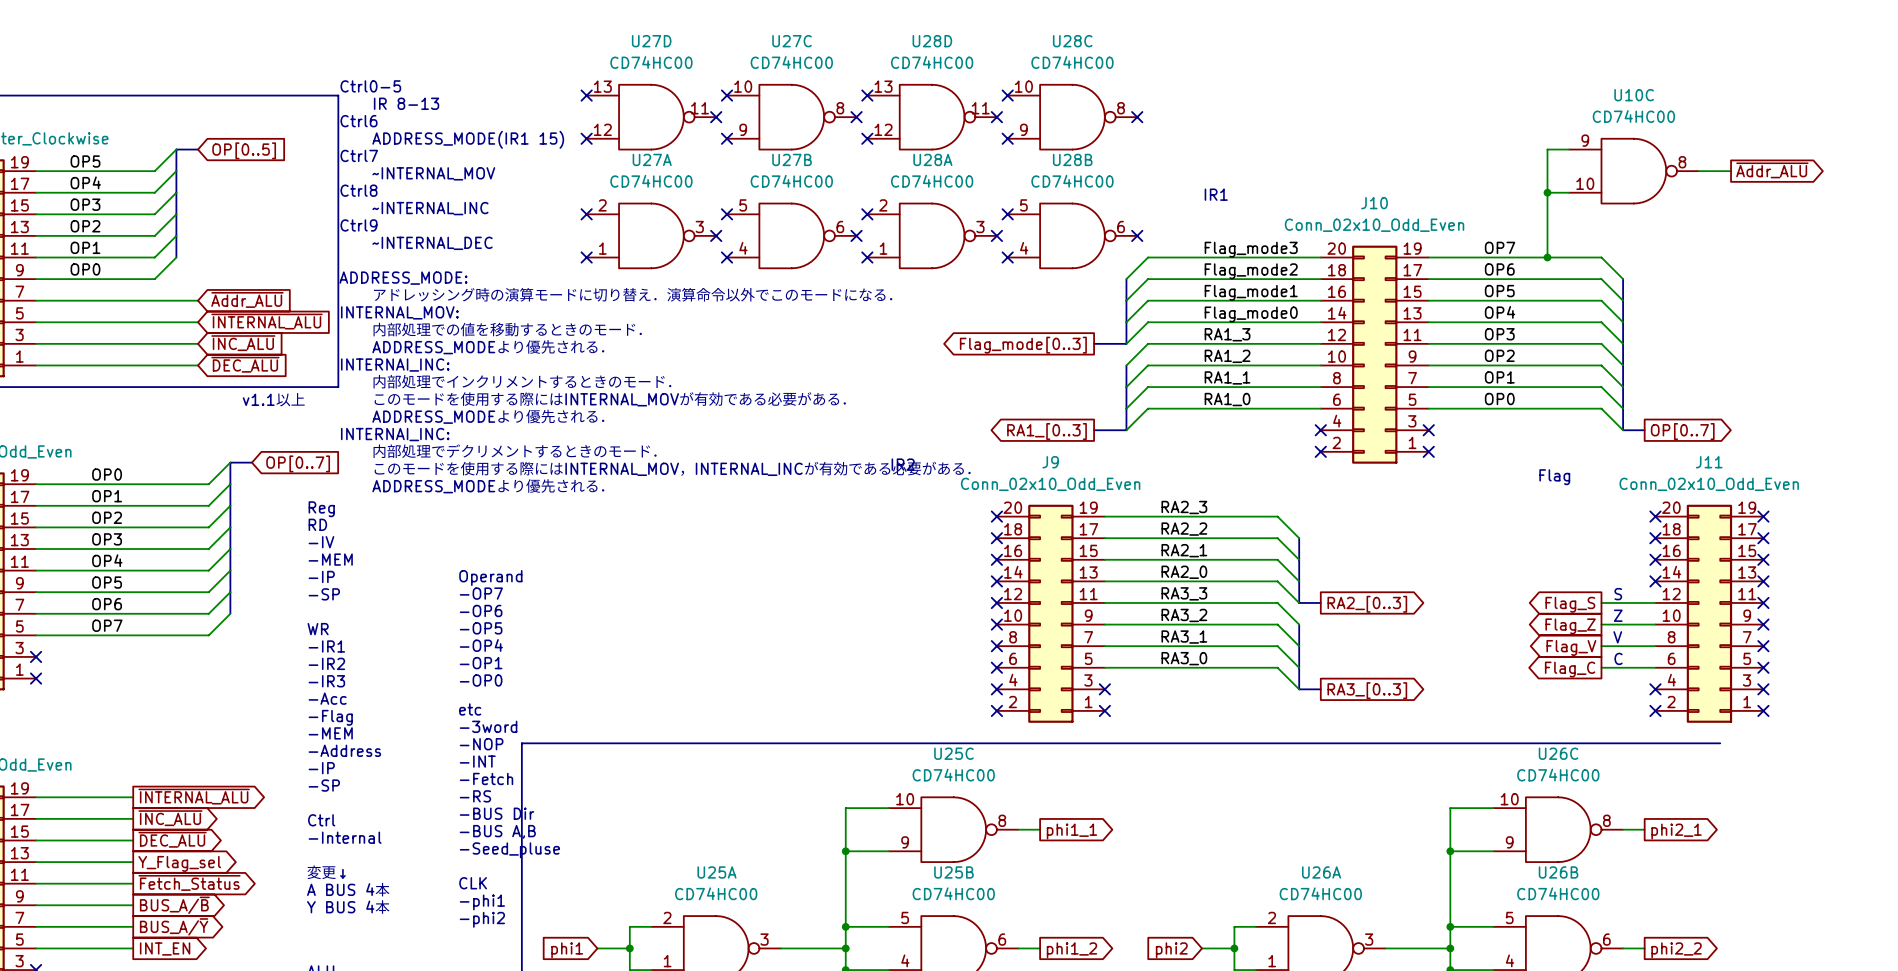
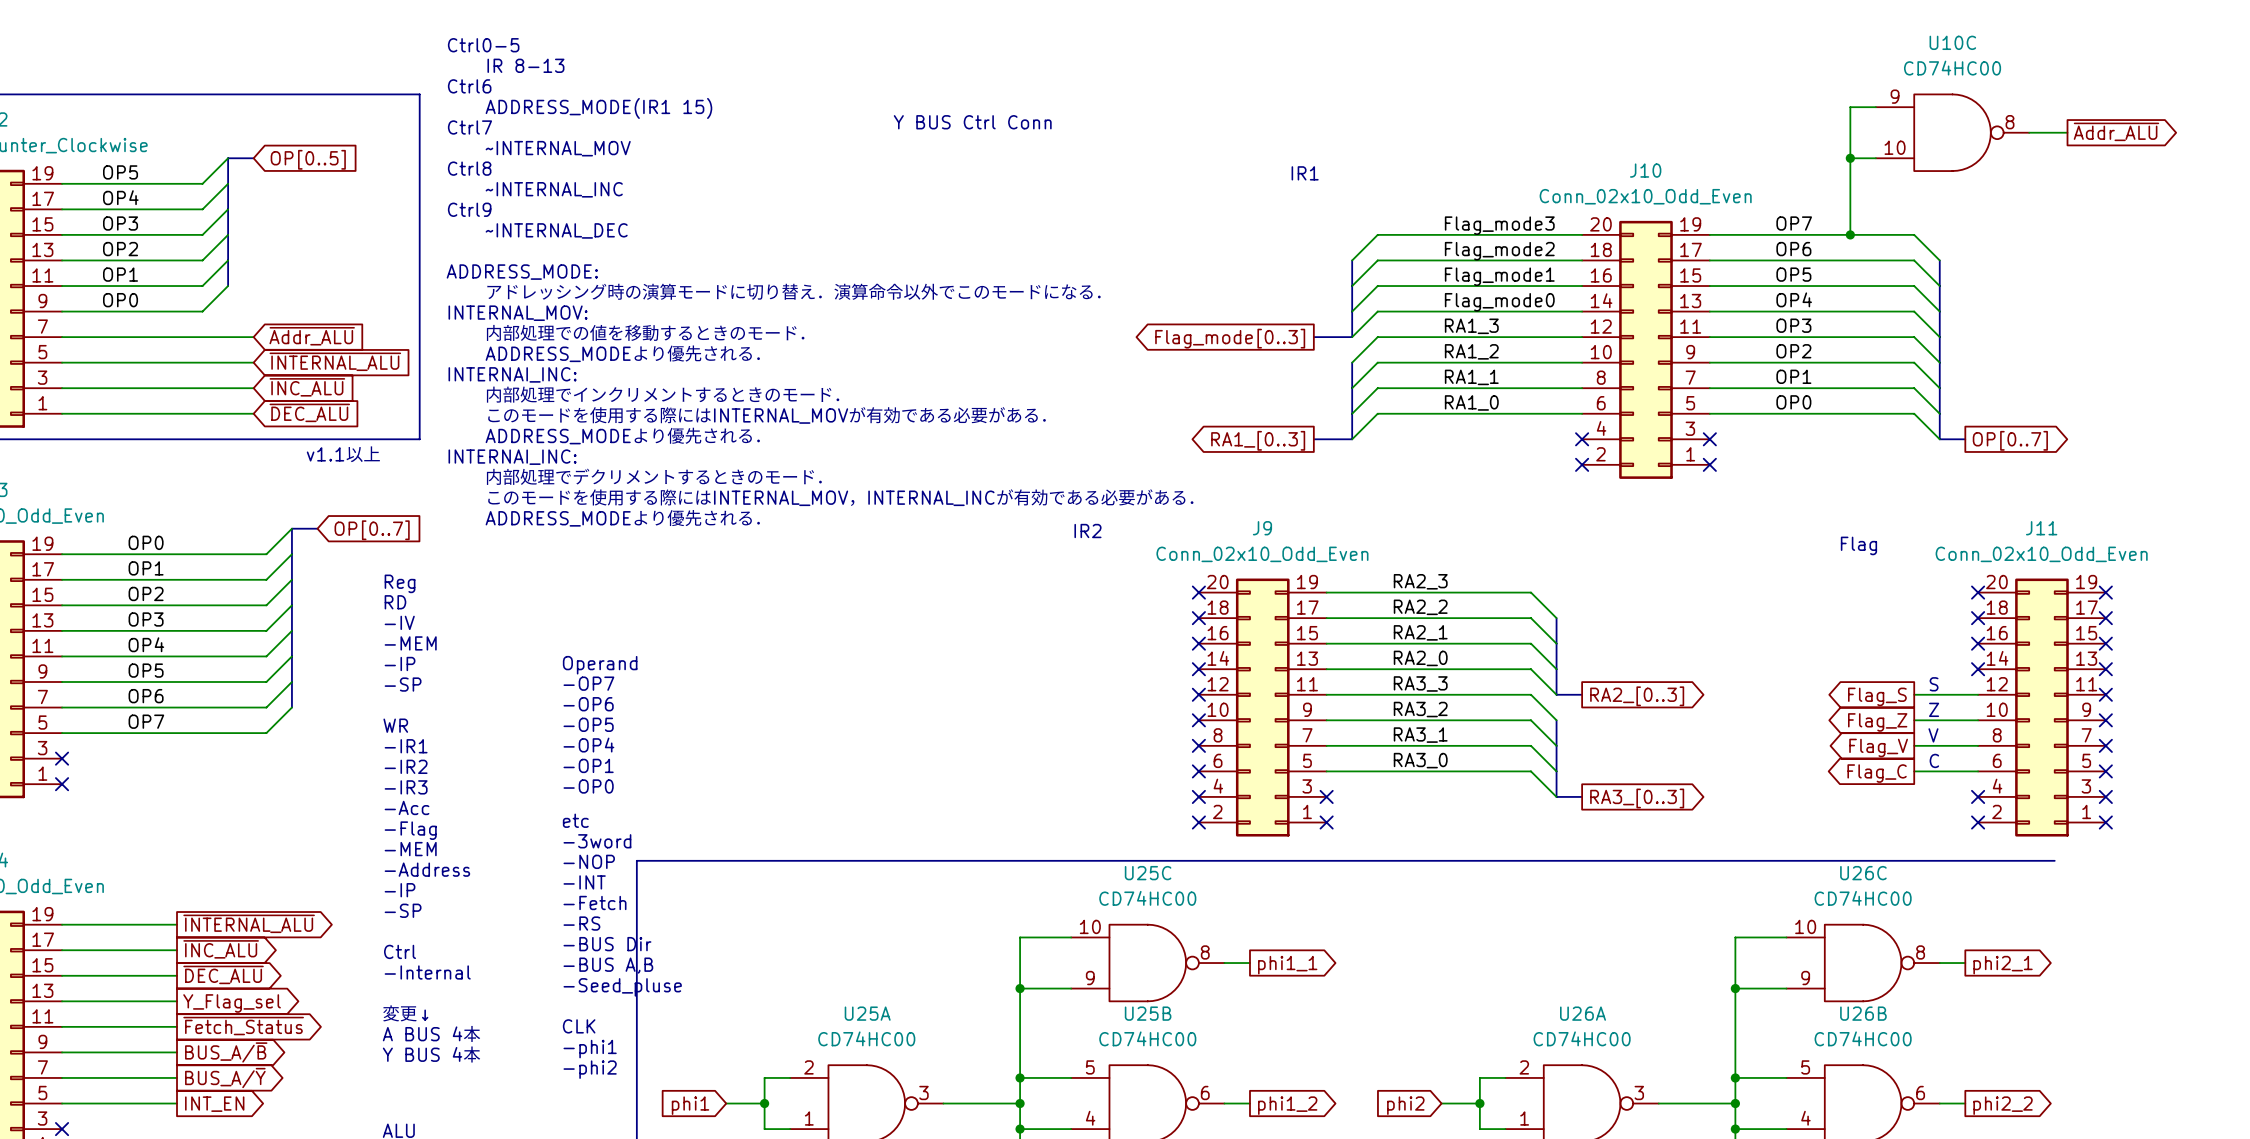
text position: Ctrl0-5 (370, 86) -> Ctrl0-5 (483, 45)
no-connect mark: (586, 95) -> none
no-connect mark: (727, 95) -> none
no-connect mark: (867, 95) -> none
no-connect mark: (1007, 95) -> none
text position: IR 8-13 (406, 103) -> IR 8-13 (525, 65)
wire: none -> (1875, 107) (1850, 107) (1850, 158)
U27D: CD74HC00 (651, 117) -> none
no-connect mark: (716, 117) -> none
U27C: CD74HC00 (791, 117) -> none
no-connect mark: (856, 117) -> none
U28D: CD74HC00 (932, 117) -> none
no-connect mark: (996, 117) -> none
U28C: CD74HC00 (1072, 117) -> none
no-connect mark: (1137, 117) -> none
text: none -> Y BUS Ctrl Conn (972, 122)
text position: Ctrl6 (358, 121) -> Ctrl6 (469, 86)
no-connect mark: (586, 138) -> none
no-connect mark: (727, 138) -> none
no-connect mark: (867, 138) -> none
no-connect mark: (1007, 138) -> none
text position: ADDRESS_MODE(IR1 15) (468, 139) -> ADDRESS_MODE(IR1 15) (598, 108)
junction: none -> (1850, 158)
text position: Ctrl7 (359, 155) -> Ctrl7 (469, 127)
global label position: ~{Addr_ALU} (1772, 170) -> ~{Addr_ALU} (2116, 131)
U10C position: (1633, 171) -> (1952, 132)
wire: (1698, 171) (1731, 171) -> (2029, 132) (2067, 132)
text position: ~INTERNAL_MOV (433, 173) -> ~INTERNAL_MOV (558, 148)
text position: Ctrl8 (358, 190) -> Ctrl8 (469, 168)
wire: (1547, 192) (1569, 192) -> none
junction: (1547, 192) -> none
text position: IR1 (1216, 194) -> IR1 (1305, 173)
label: none -> OP7 (1794, 223)
label: none -> Flag_mode3 (1499, 225)
text position: ~INTERNAL_INC (430, 208) -> ~INTERNAL_INC (554, 189)
no-connect mark: (586, 214) -> none
no-connect mark: (727, 214) -> none
no-connect mark: (867, 214) -> none
no-connect mark: (1007, 214) -> none
wire: (1547, 214) (1547, 257) -> none
junction: none -> (1850, 234)
text position: Ctrl9 (358, 225) -> Ctrl9 (469, 209)
label: none -> OP6 (1793, 249)
label: none -> Flag_mode2 (1499, 251)
U27A: CD74HC00 (651, 235) -> none
no-connect mark: (716, 235) -> none
U27B: CD74HC00 (791, 235) -> none
no-connect mark: (856, 235) -> none
U28A: CD74HC00 (932, 235) -> none
no-connect mark: (996, 235) -> none
U28B: CD74HC00 (1072, 235) -> none
bus: none -> (1352, 260) (1352, 311)
no-connect mark: (1137, 235) -> none
bus: none -> (1939, 260) (1939, 311)
text position: ~INTERNAL_DEC (432, 243) -> ~INTERNAL_DEC (556, 230)
label: OP7 (1500, 247) -> OP5 (1793, 274)
label: Flag_mode3 (1251, 249) -> Flag_mode1 (1499, 276)
no-connect mark: (586, 257) -> none
no-connect mark: (727, 257) -> none
no-connect mark: (867, 257) -> none
no-connect mark: (1007, 257) -> none
junction: (1547, 257) -> none
label: OP6 (1499, 269) -> OP4 (1794, 299)
label: Flag_mode2 (1251, 271) -> Flag_mode0 (1499, 302)
text position: ADDRESS_MODE: (403, 278) -> ADDRESS_MODE: (522, 272)
label: OP5 (1499, 291) -> OP3 (1793, 325)
label: Flag_mode1 (1251, 292) -> RA1_3 (1471, 326)
text position: アドレッシング時の演算モードに切り替え．演算命令以外でこのモードになる． (633, 294) -> アドレッシング時の演算モードに切り替え．演算命令以外でこのモードになる． (794, 291)
bus: (1126, 300) (1126, 322) -> (1352, 337) (1313, 337)
text position: INTERNAL_MOV: (399, 312) -> INTERNAL_MOV: (518, 313)
label: OP4 (1500, 312) -> OP2 (1793, 351)
text: none -> ADDRESS_MODEより優先される． (623, 353)
label: Flag_mode0 (1251, 314) -> RA1_2 (1471, 351)
text position: 内部処理での値を移動するときのモード． (507, 329) -> 内部処理での値を移動するときのモード． (645, 332)
text: none -> INTERNAI_INC: (512, 374)
label: RA1_3 (1227, 334) -> RA1_1 (1471, 377)
label: OP3 (1499, 334) -> OP1 (1793, 376)
bus: (1094, 343) (1126, 343) -> (1352, 413) (1352, 388)
global label position: Flag_mode[0..3] (1023, 345) -> Flag_mode[0..3] (1230, 338)
text: ADDRESS_MODEより優先される． (488, 346) -> none
J10 position: (1374, 354) -> (1645, 349)
label: OP2 (1499, 355) -> OP0 (1793, 402)
label: RA1_2 (1227, 356) -> RA1_0 (1471, 402)
text: INTERNAI_INC: (395, 365) -> none
label: RA1_1 (1227, 377) -> none
label: OP1 (1499, 377) -> none
text position: 内部処理でインクリメントするときのモード． (522, 381) -> 内部処理でインクリメントするときのモード． (663, 394)
text: none -> ADDRESS_MODEより優先される． (623, 435)
bus: (1126, 387) (1126, 430) (1094, 430) -> (1352, 439) (1313, 439)
wire: (1320, 387) (1148, 387) (1126, 408) -> (1582, 234) (1377, 234) (1352, 260)
no-connect mark: none -> (1582, 439)
wire: (1428, 387) (1601, 387) (1623, 408) -> (1709, 234) (1914, 234) (1939, 260)
no-connect mark: none -> (1709, 439)
bus: (1623, 387) (1623, 430) (1644, 430) -> (1939, 439) (1965, 439)
text position: このモードを使用する際にはINTERNAL_MOVが有効である必要がある． (610, 399) -> このモードを使用する際にはINTERNAL_MOVが有効である必要がある． (767, 415)
label: RA1_0 (1227, 399) -> none
label: OP0 (1499, 399) -> none
text: none -> INTERNAI_INC: (512, 457)
wire: (1320, 408) (1148, 408) (1126, 430) -> (1582, 260) (1377, 260) (1352, 286)
no-connect mark: none -> (1582, 464)
wire: (1428, 408) (1601, 408) (1623, 430) -> (1709, 260) (1914, 260) (1939, 286)
no-connect mark: none -> (1709, 464)
text: ADDRESS_MODEより優先される． (488, 416) -> none
no-connect mark: (1320, 430) -> none
no-connect mark: (1428, 430) -> none
global label position: RA1_[0..3] (1047, 431) -> RA1_[0..3] (1258, 440)
global label position: OP[0..7] (1682, 431) -> OP[0..7] (2010, 440)
text: INTERNAI_INC: (395, 434) -> none
text position: 内部処理でデクリメントするときのモード． (515, 451) -> 内部処理でデクリメントするときのモード． (654, 476)
no-connect mark: (1320, 451) -> none
no-connect mark: (1428, 451) -> none
text: none -> ADDRESS_MODEより優先される． (623, 518)
text position: このモードを使用する際にはINTERNAL_MOV，INTERNAL_INCが有効である必要がある． (672, 468) -> このモードを使用する際にはINTERNAL_MOV，INTERNAL_INCが有効である必要がある． (840, 497)
text: ADDRESS_MODEより優先される． (488, 486) -> none

